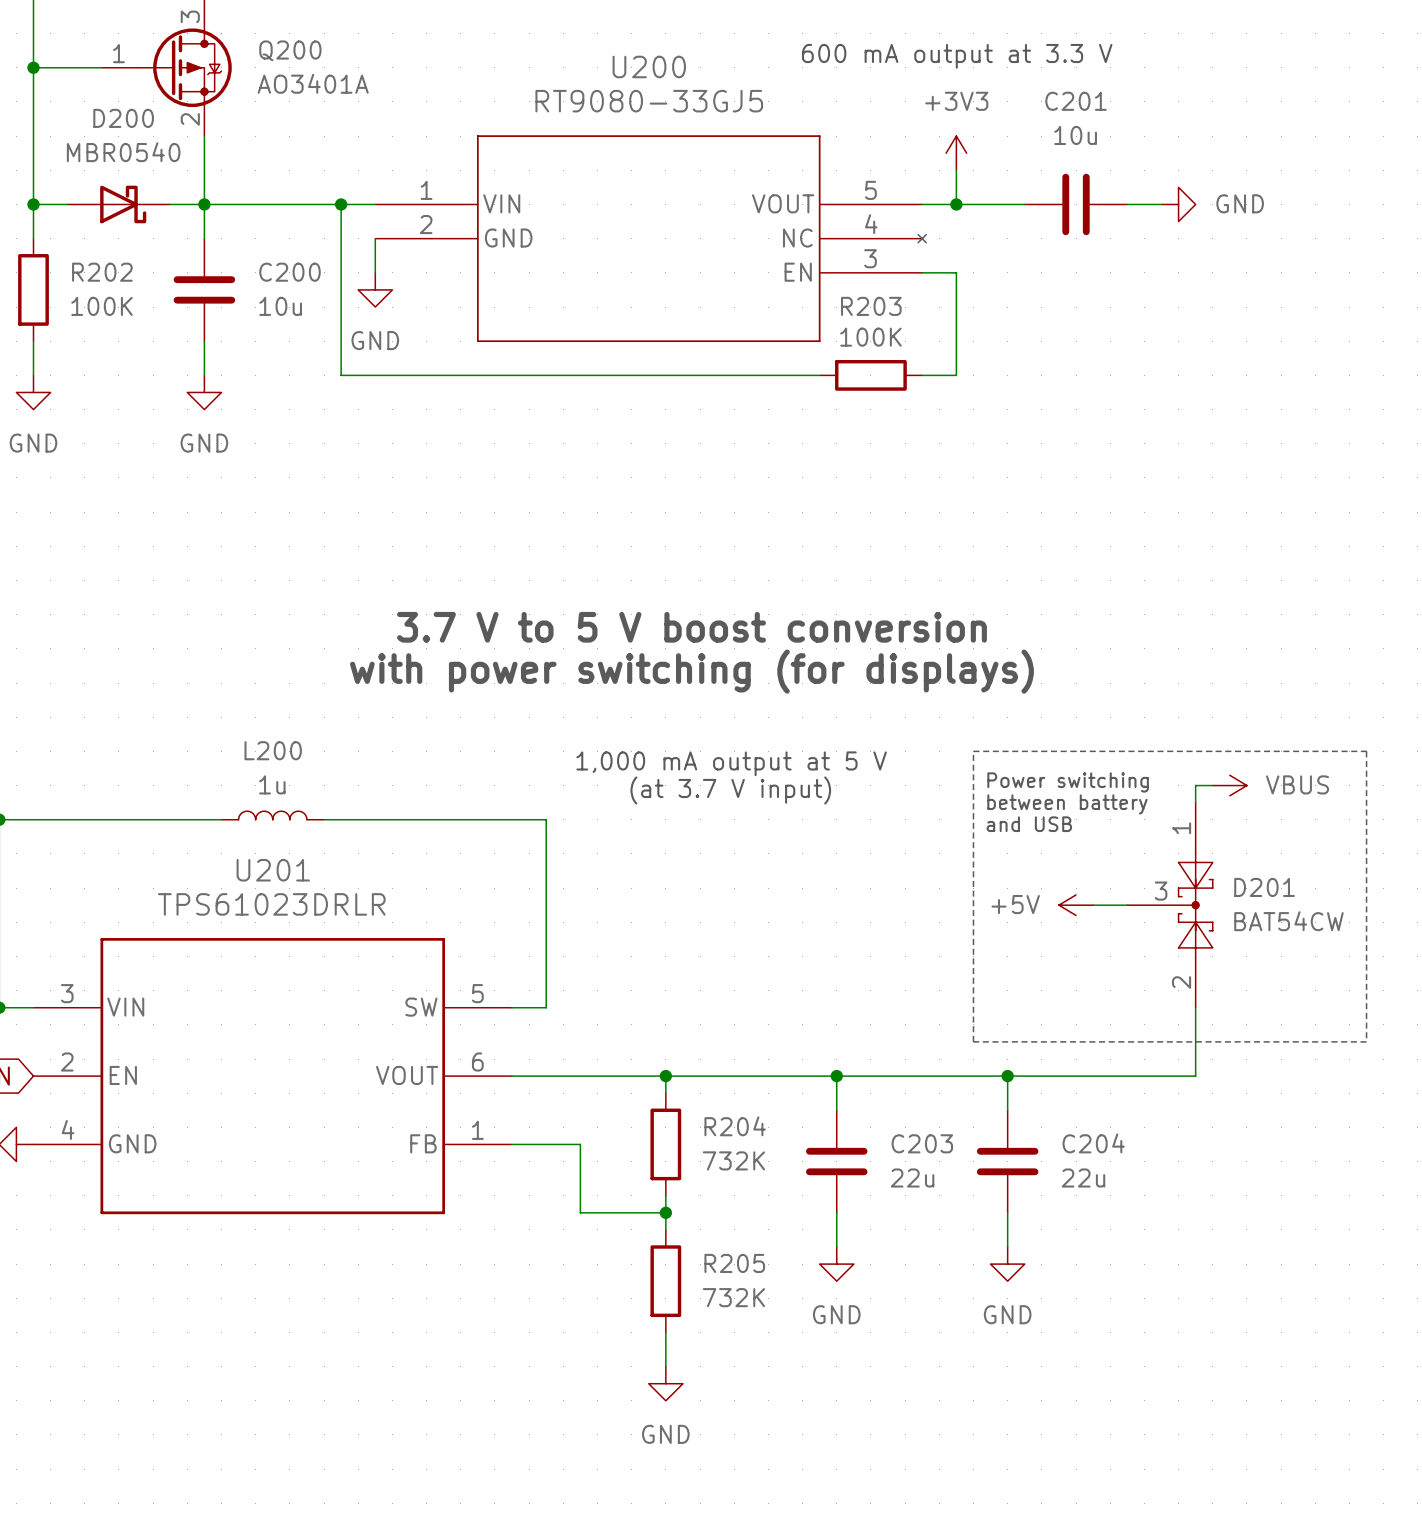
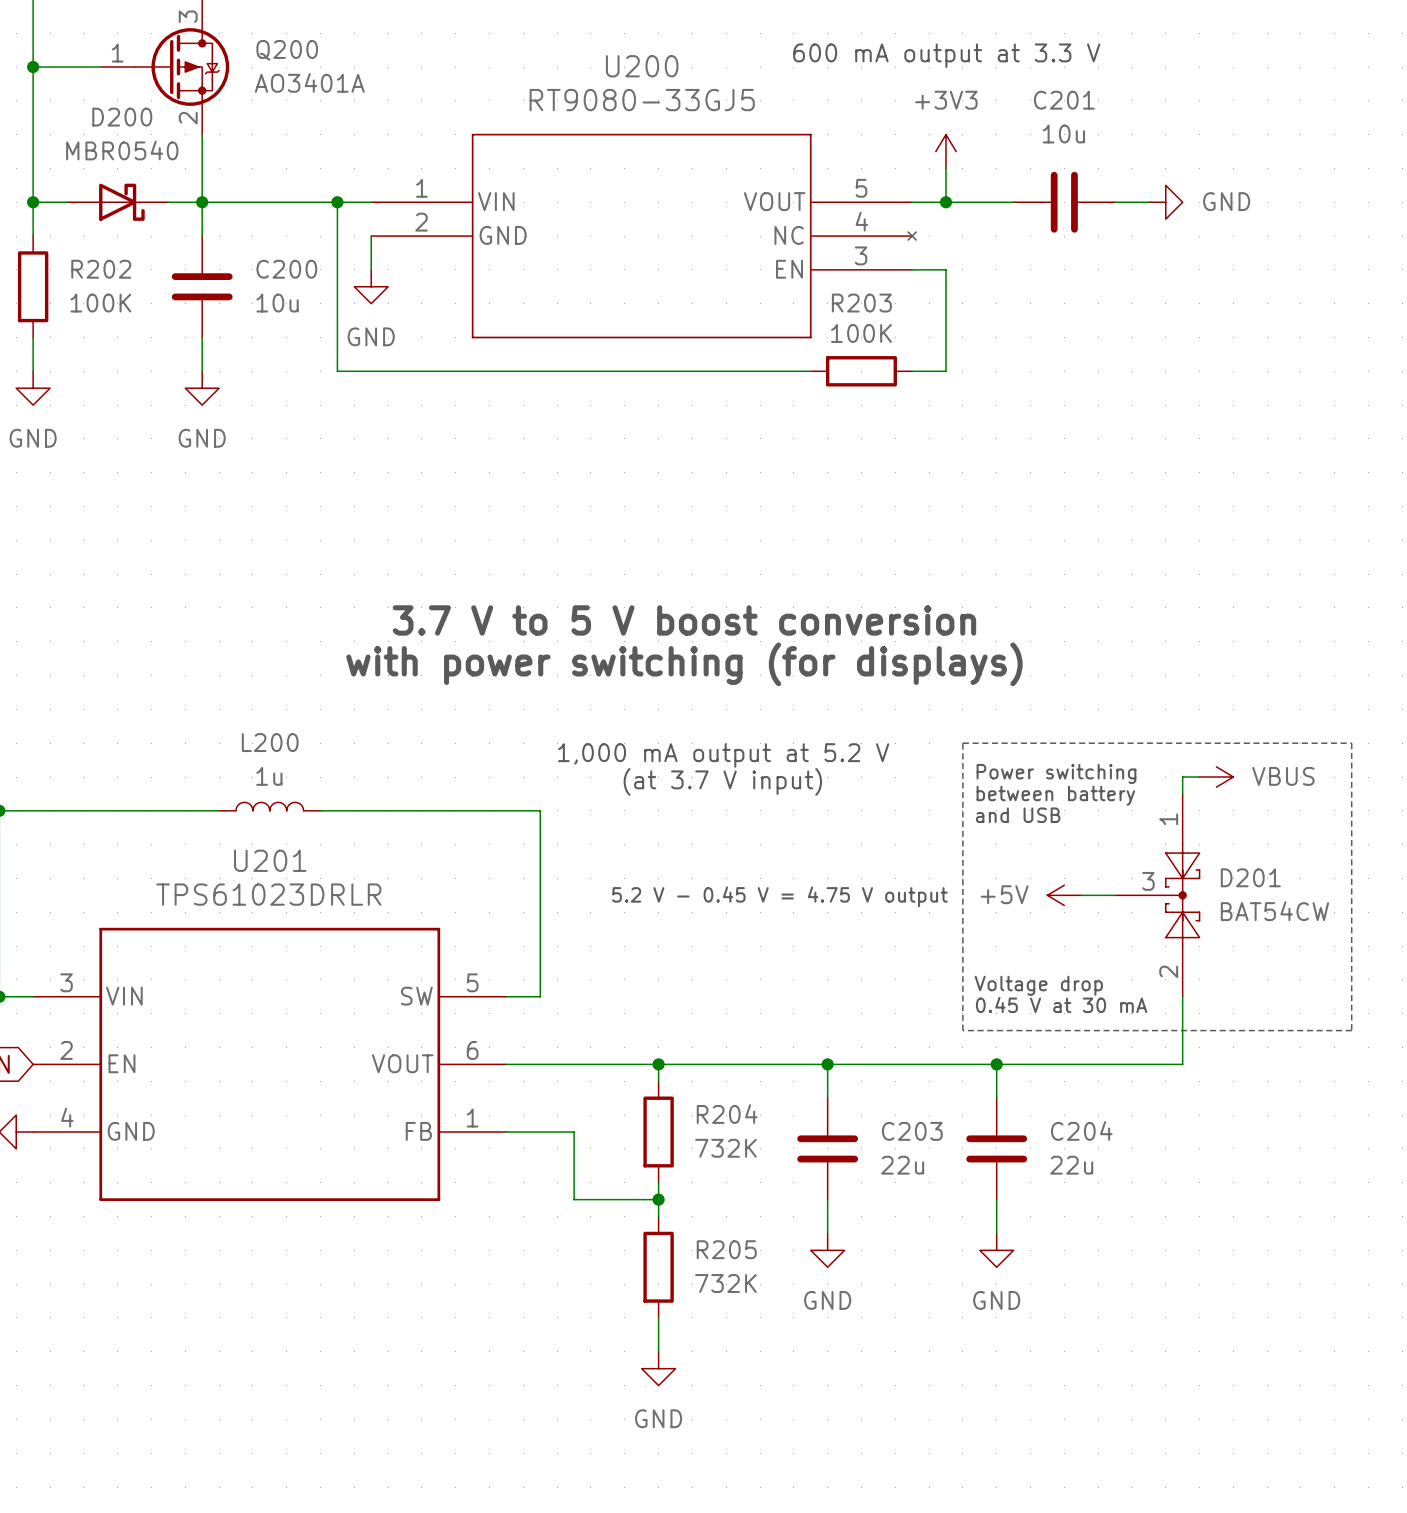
text: 1,000 mA output at 5 V (731, 763) -> 1,000 mA output at 5.2 V (723, 755)
text: none -> 5.2 V - 0.45 V = 4.75 V output (779, 896)
text: none -> Voltage drop (1038, 985)
text: none -> 0.45 V at 30 mA (1061, 1004)

